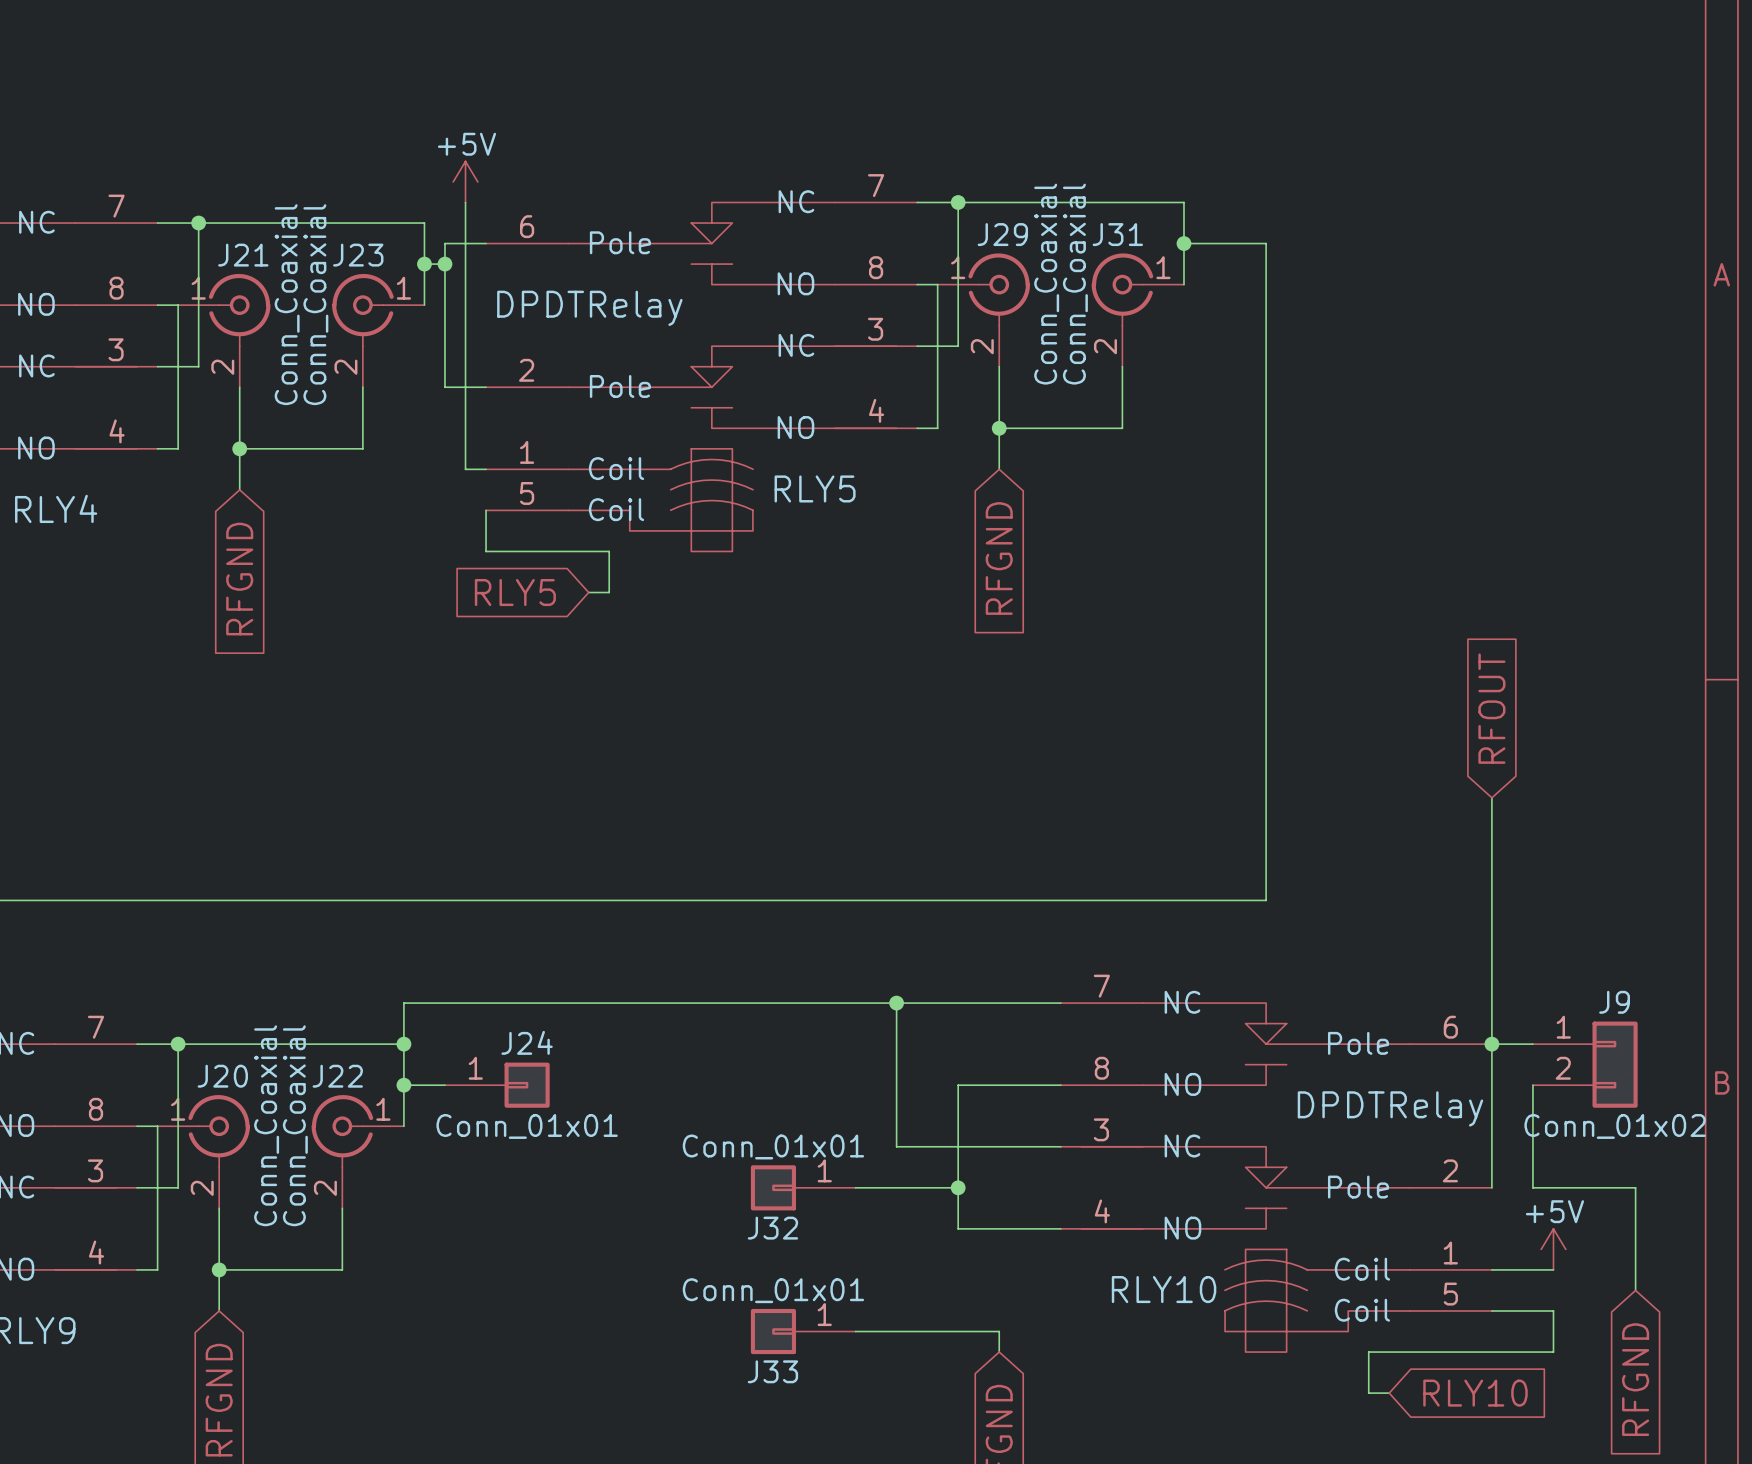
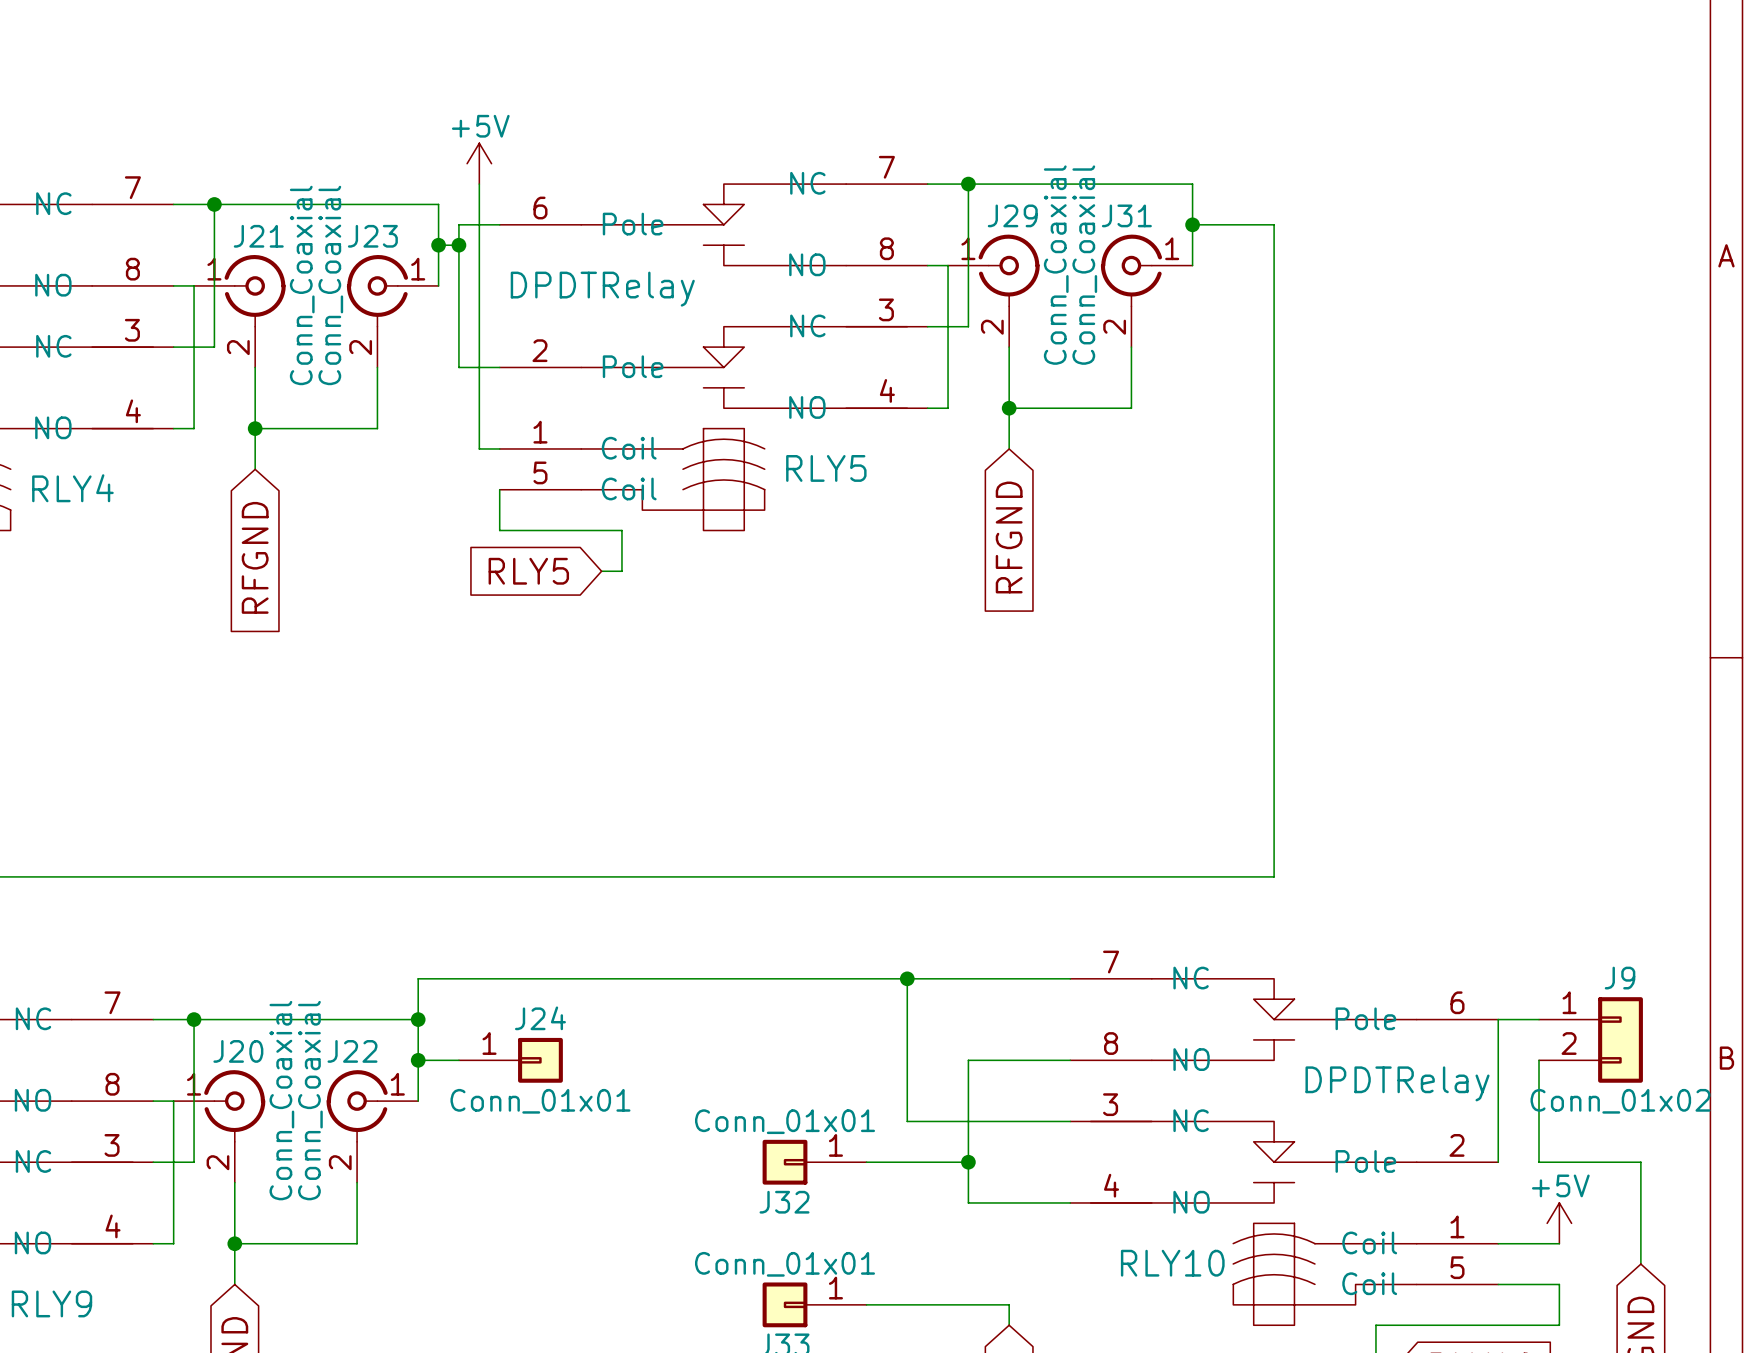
global label: RFOUT (1491, 708) -> none
wire: (1491, 797) (1491, 1044) -> none
junction: (1491, 1044) -> none

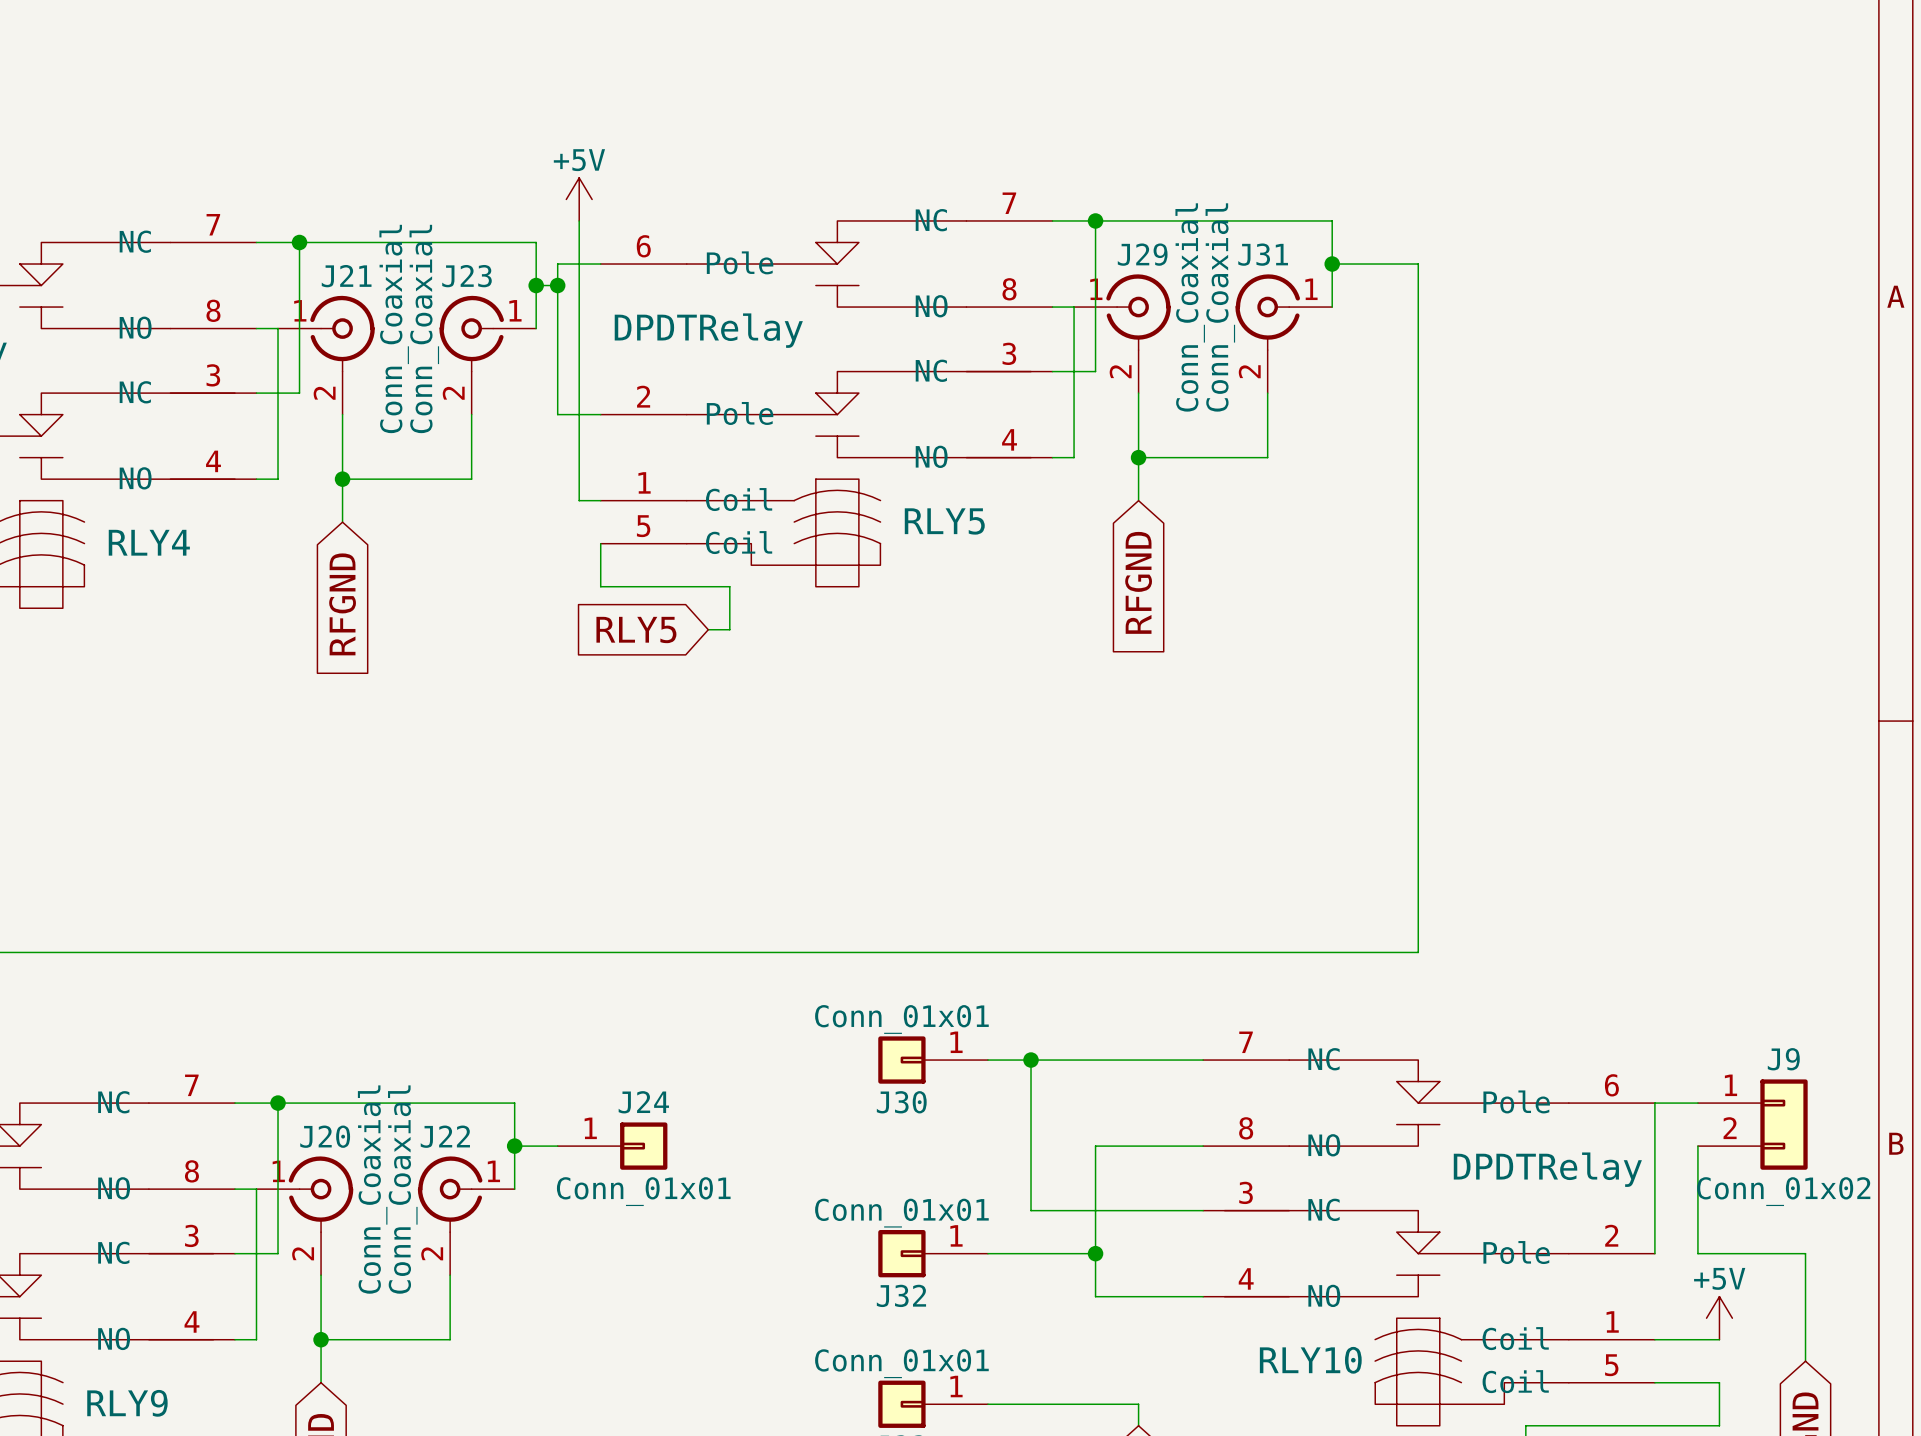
J30: none -> Conn_01x01 (933, 1060)
wire: (866, 978) (418, 978) (418, 1019) -> none
junction: (418, 1019) -> none

